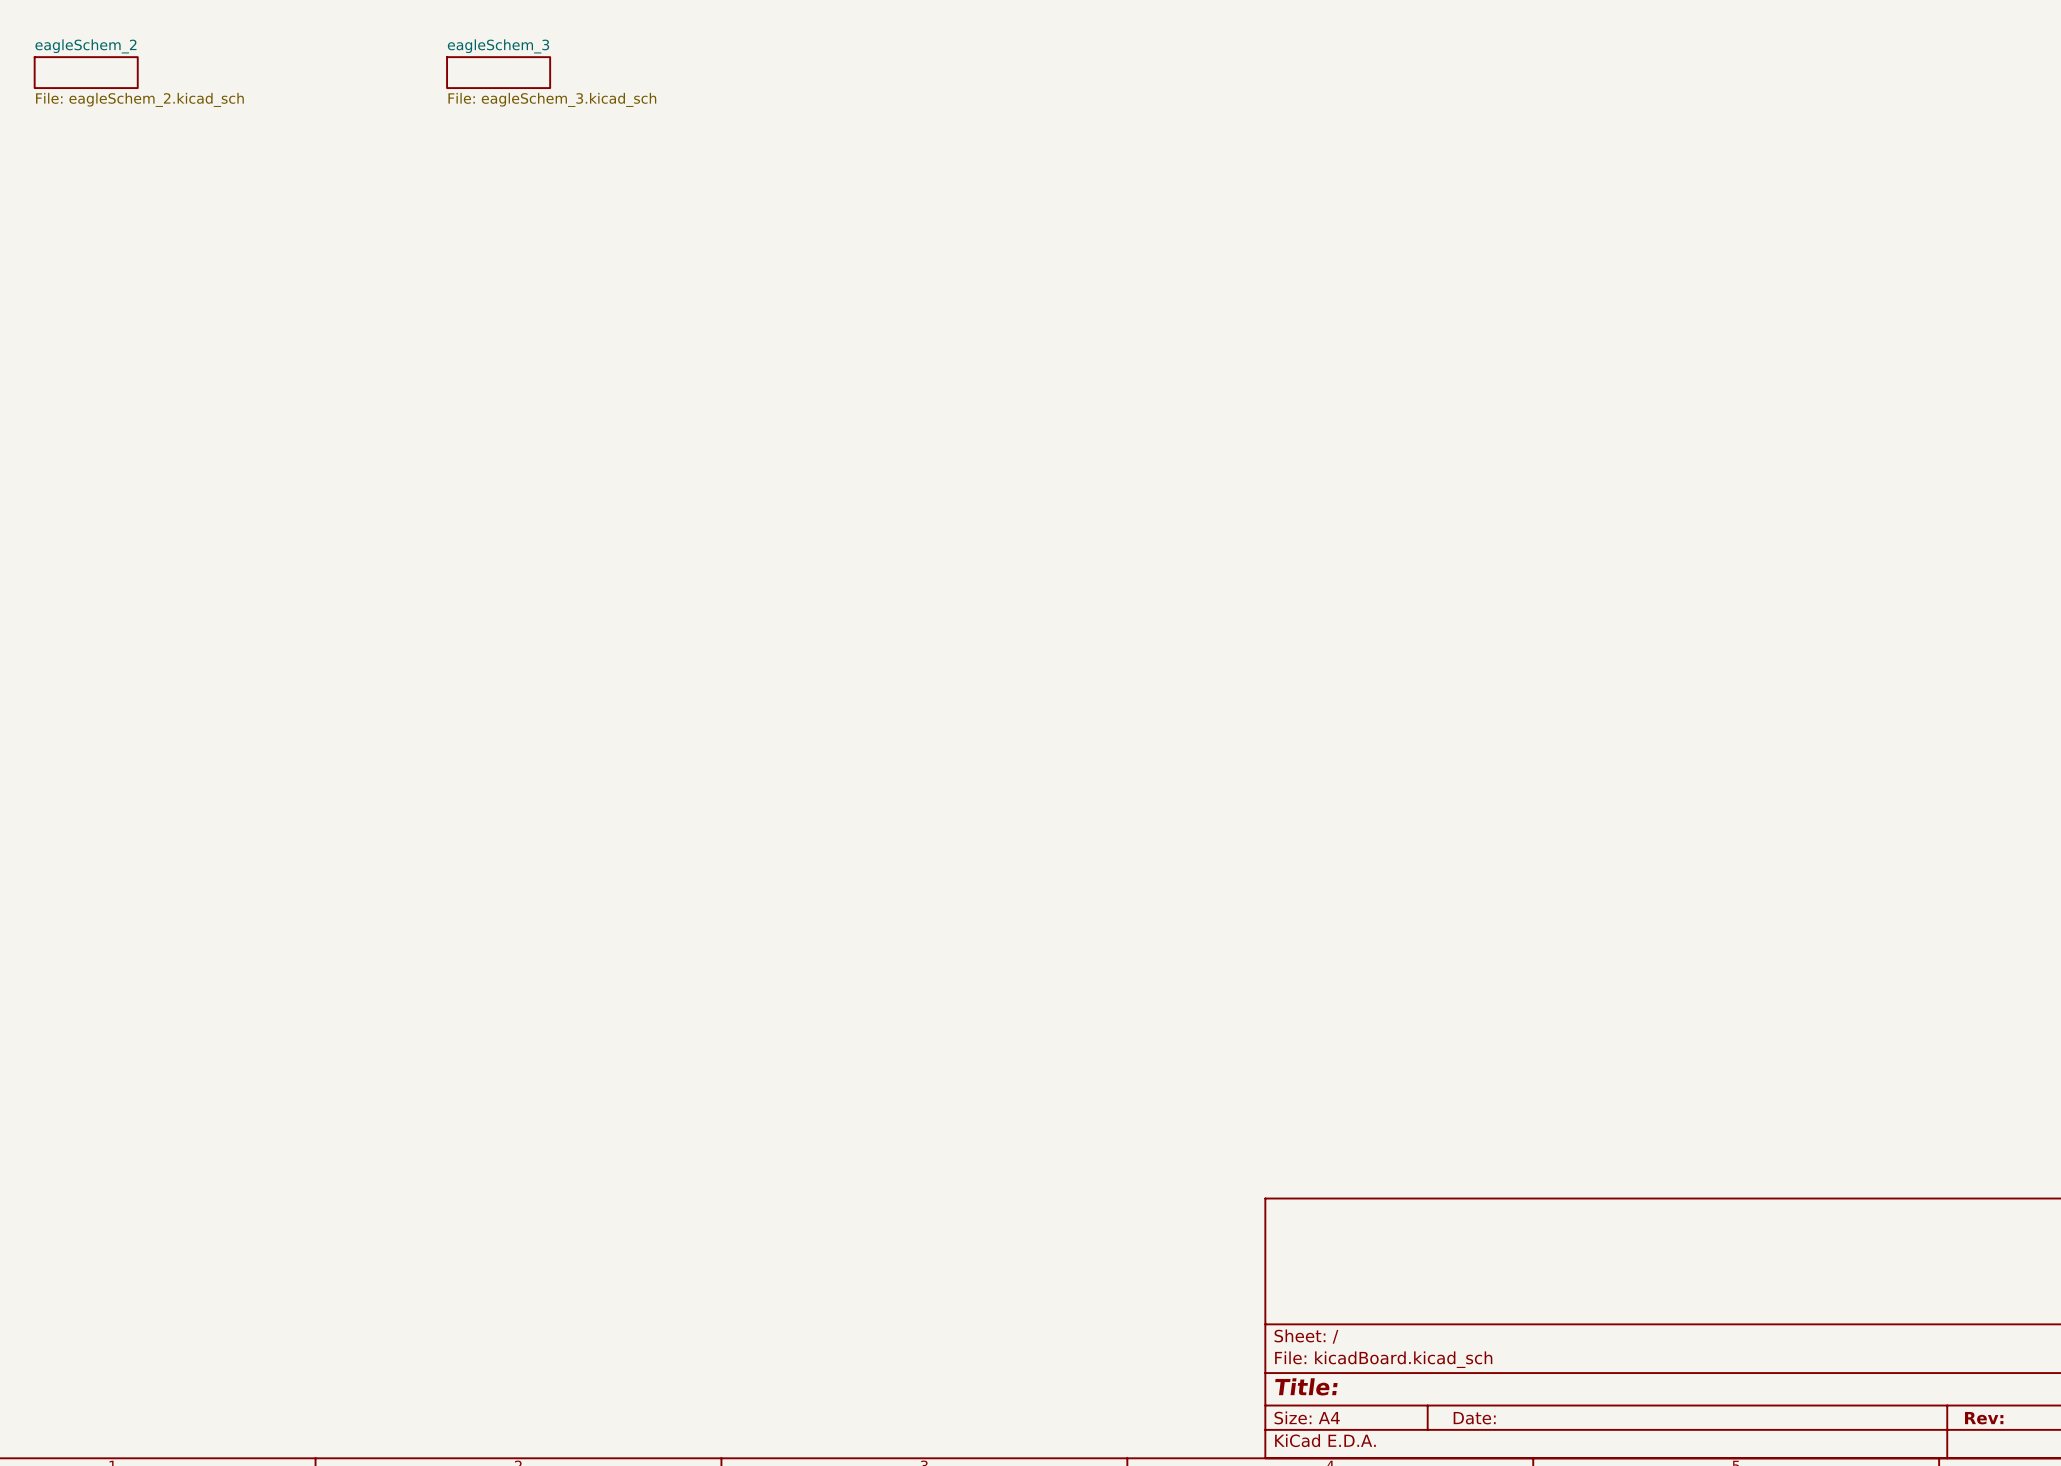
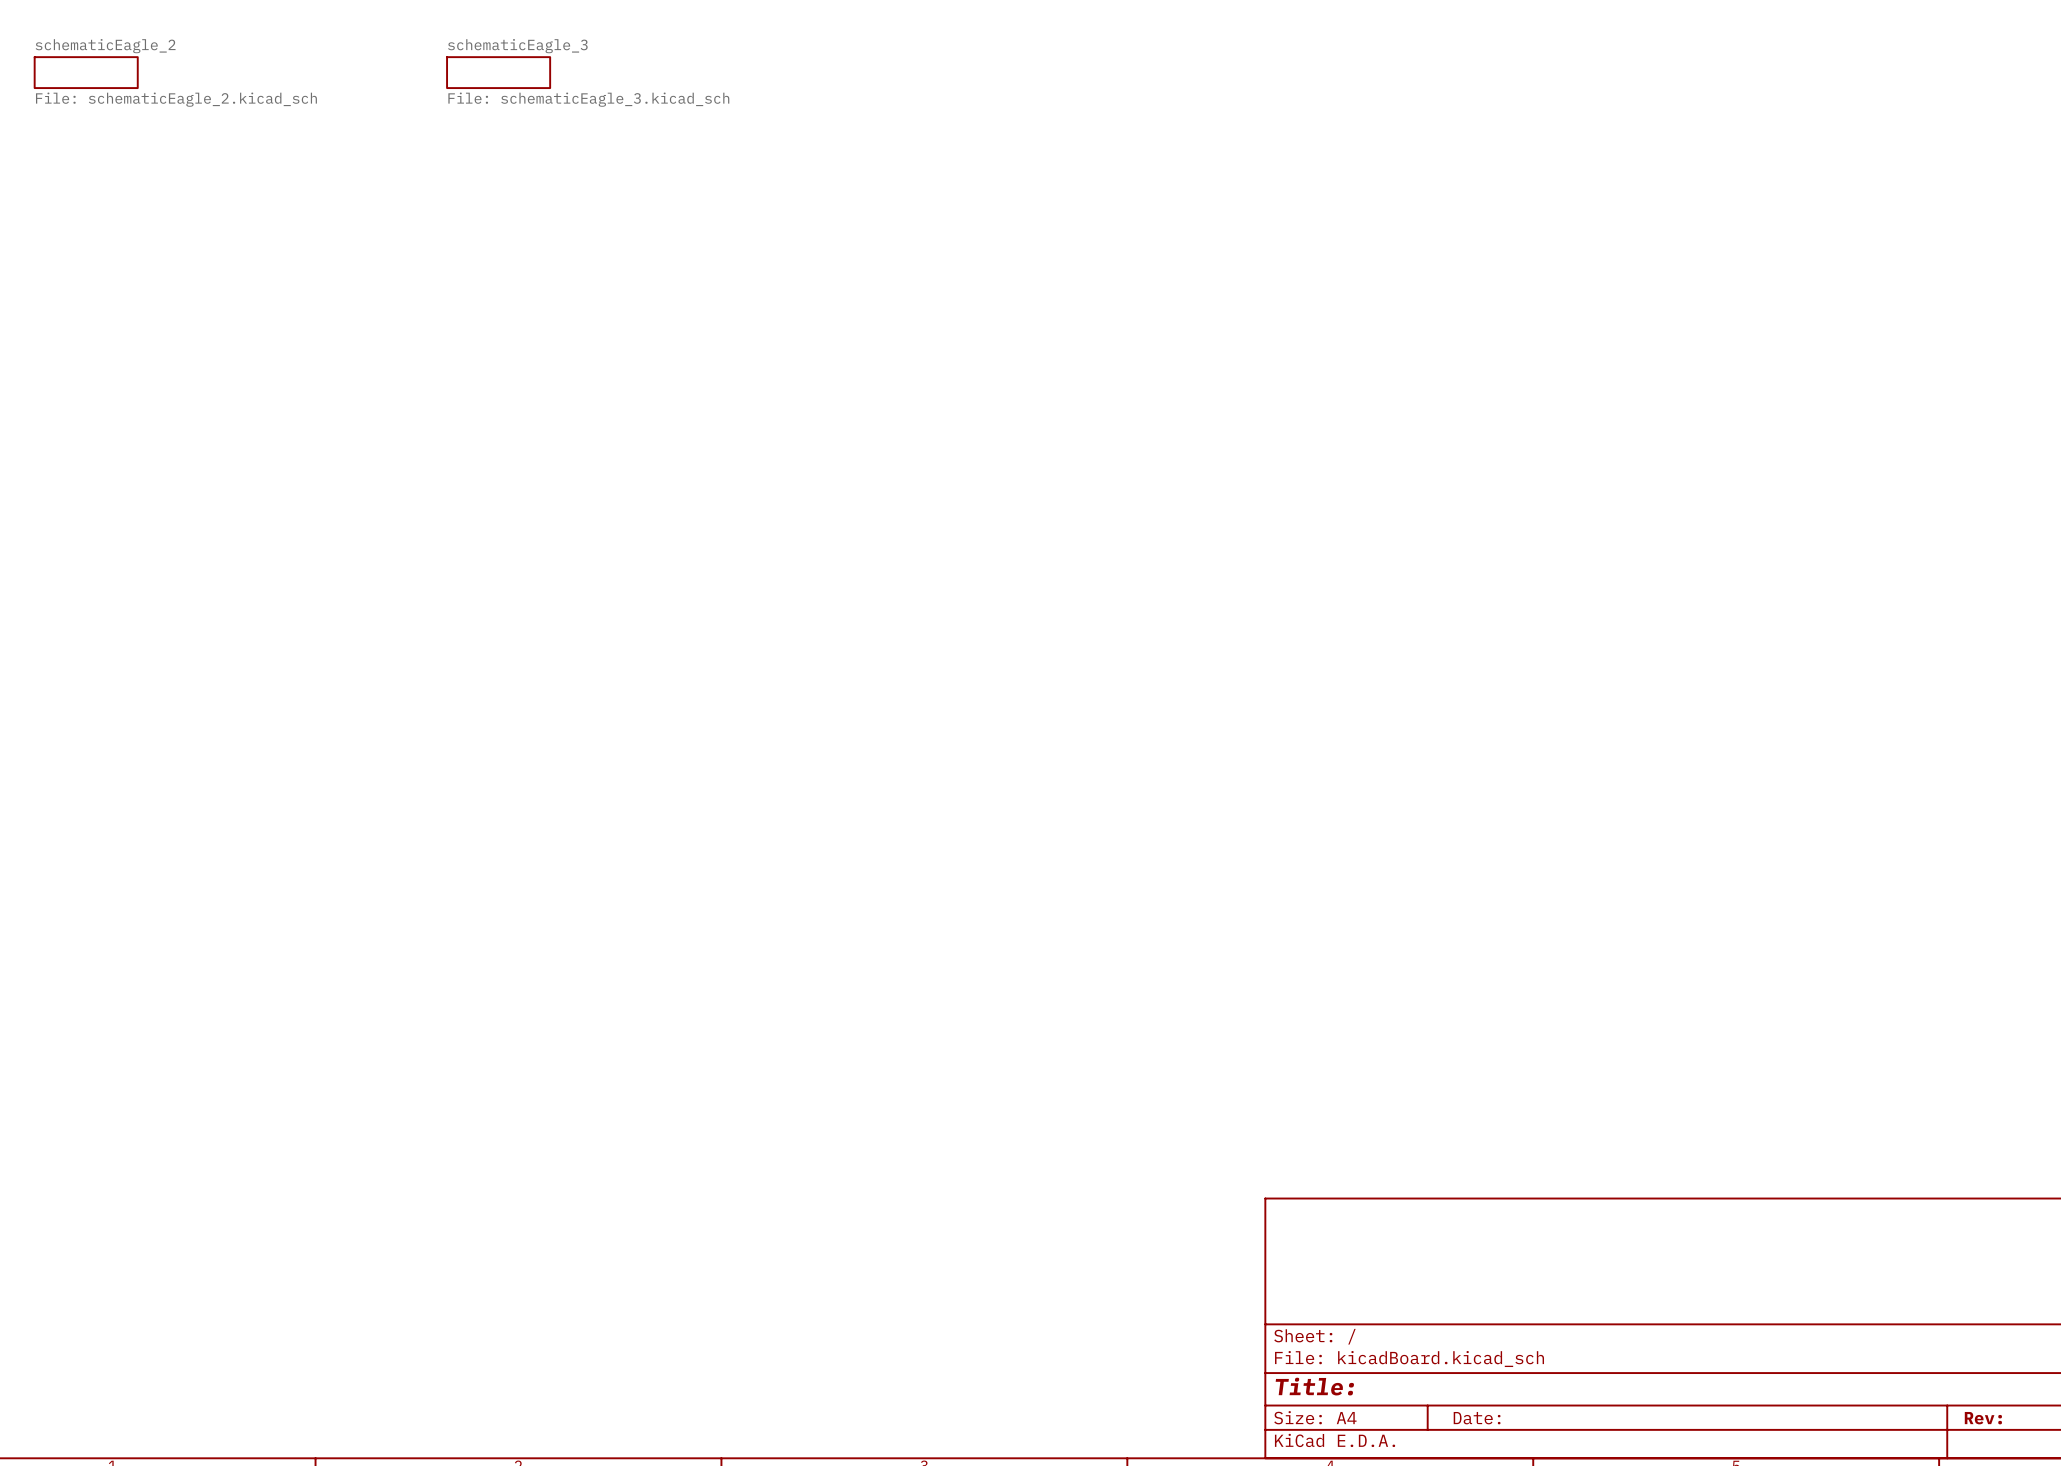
sheet eagleSchem_2 name: eagleSchem_2 (85, 46) -> schematicEagle_2 (105, 46)
sheet eagleSchem_3 name: eagleSchem_3 (498, 46) -> schematicEagle_3 (517, 46)
sheet eagleSchem_2 value: File: eagleSchem_2.kicad_sch (139, 99) -> File: schematicEagle_2.kicad_sch (176, 99)
sheet eagleSchem_3 value: File: eagleSchem_3.kicad_sch (552, 99) -> File: schematicEagle_3.kicad_sch (588, 99)

